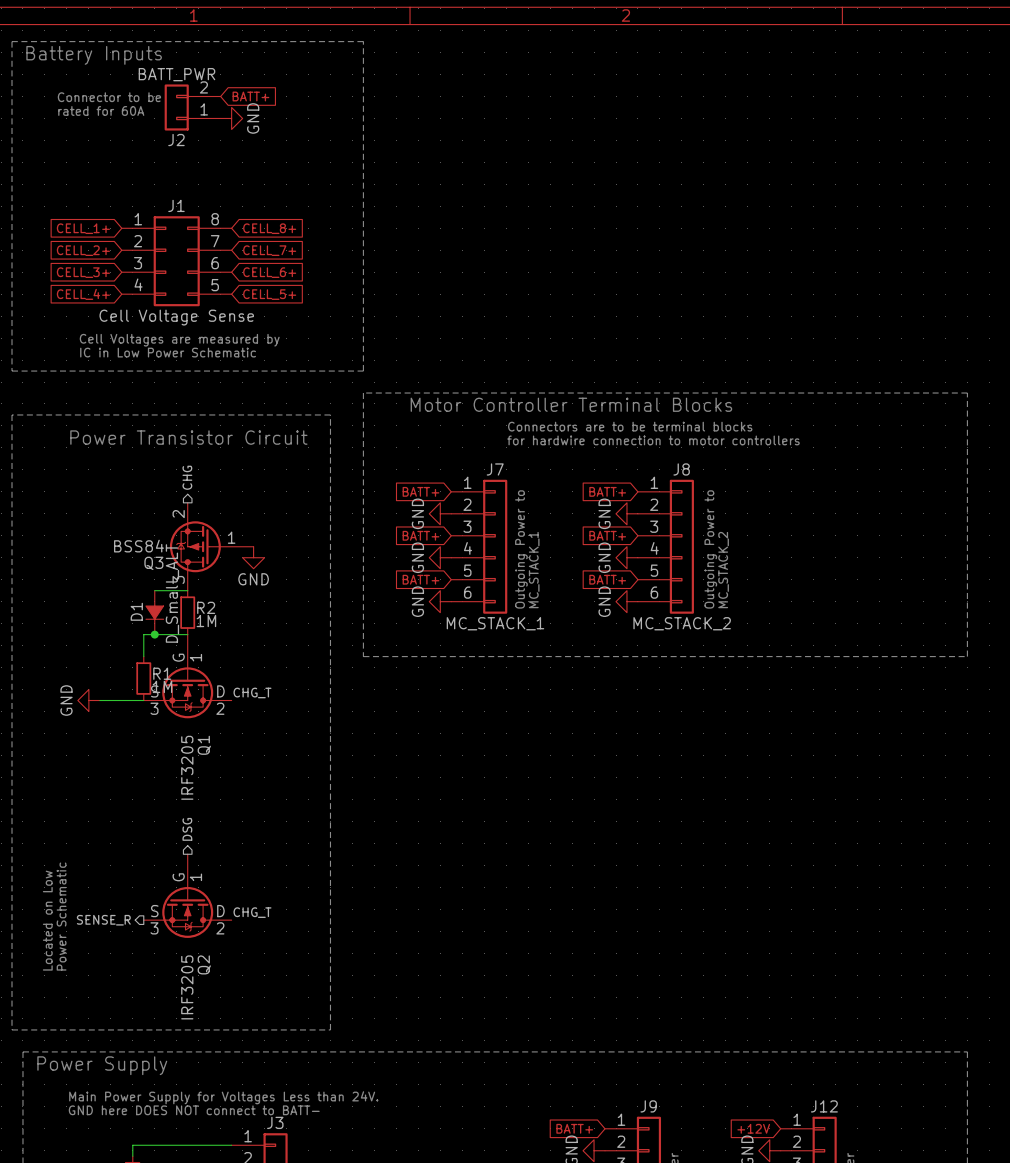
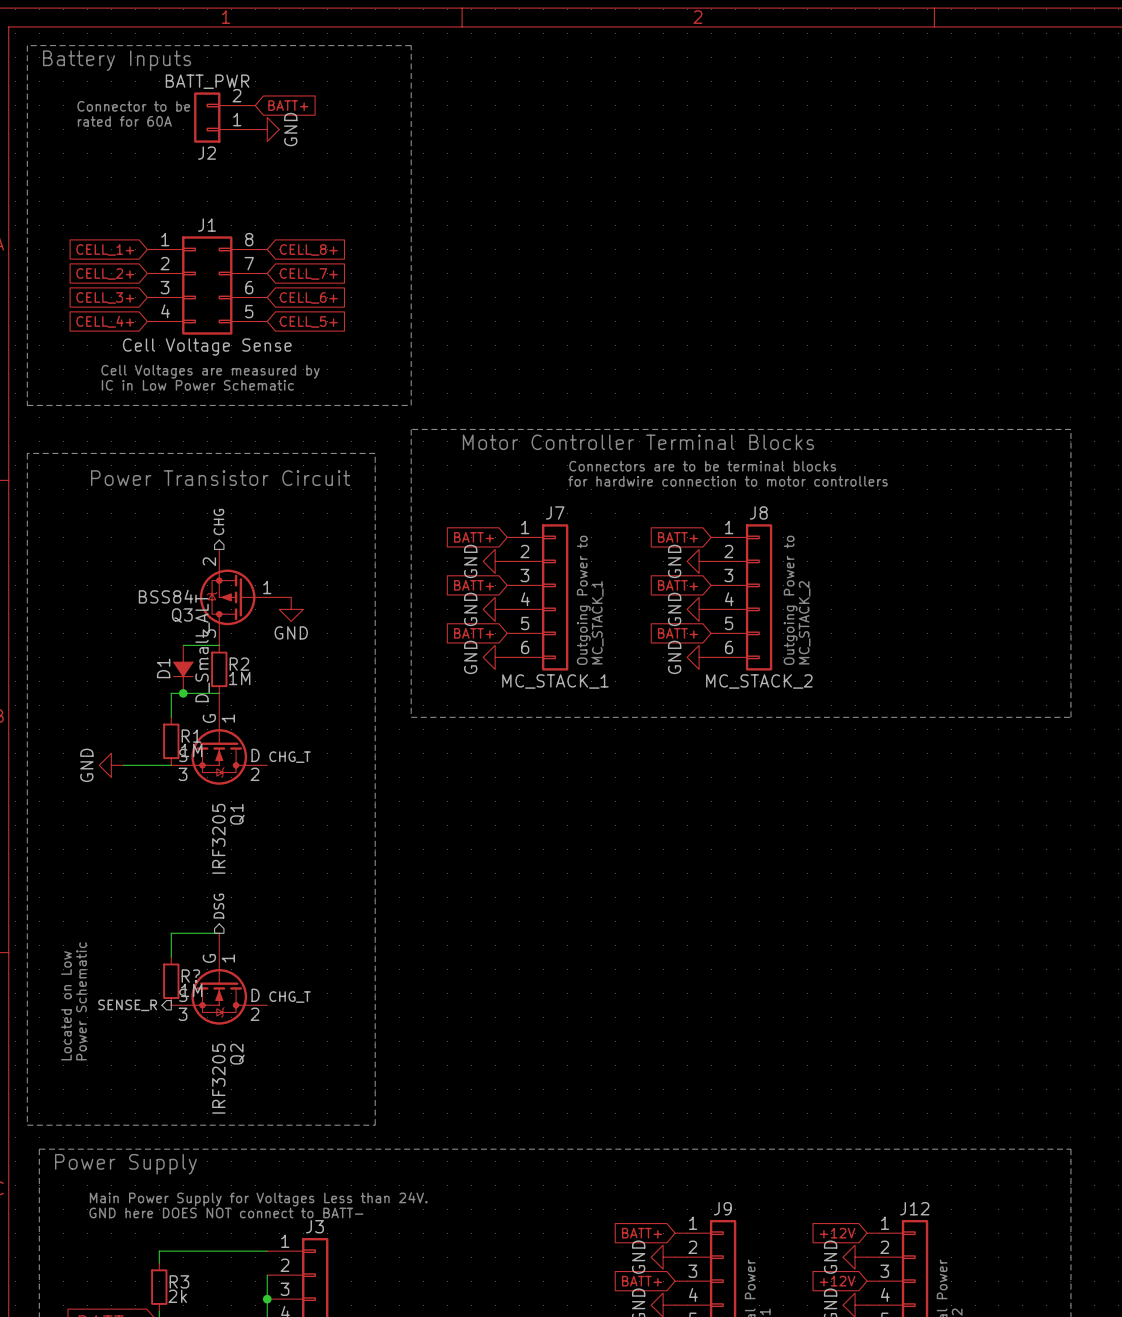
wire: none -> (219, 933) (171, 933) (171, 957)
R?: none -> 1M (171, 981)

